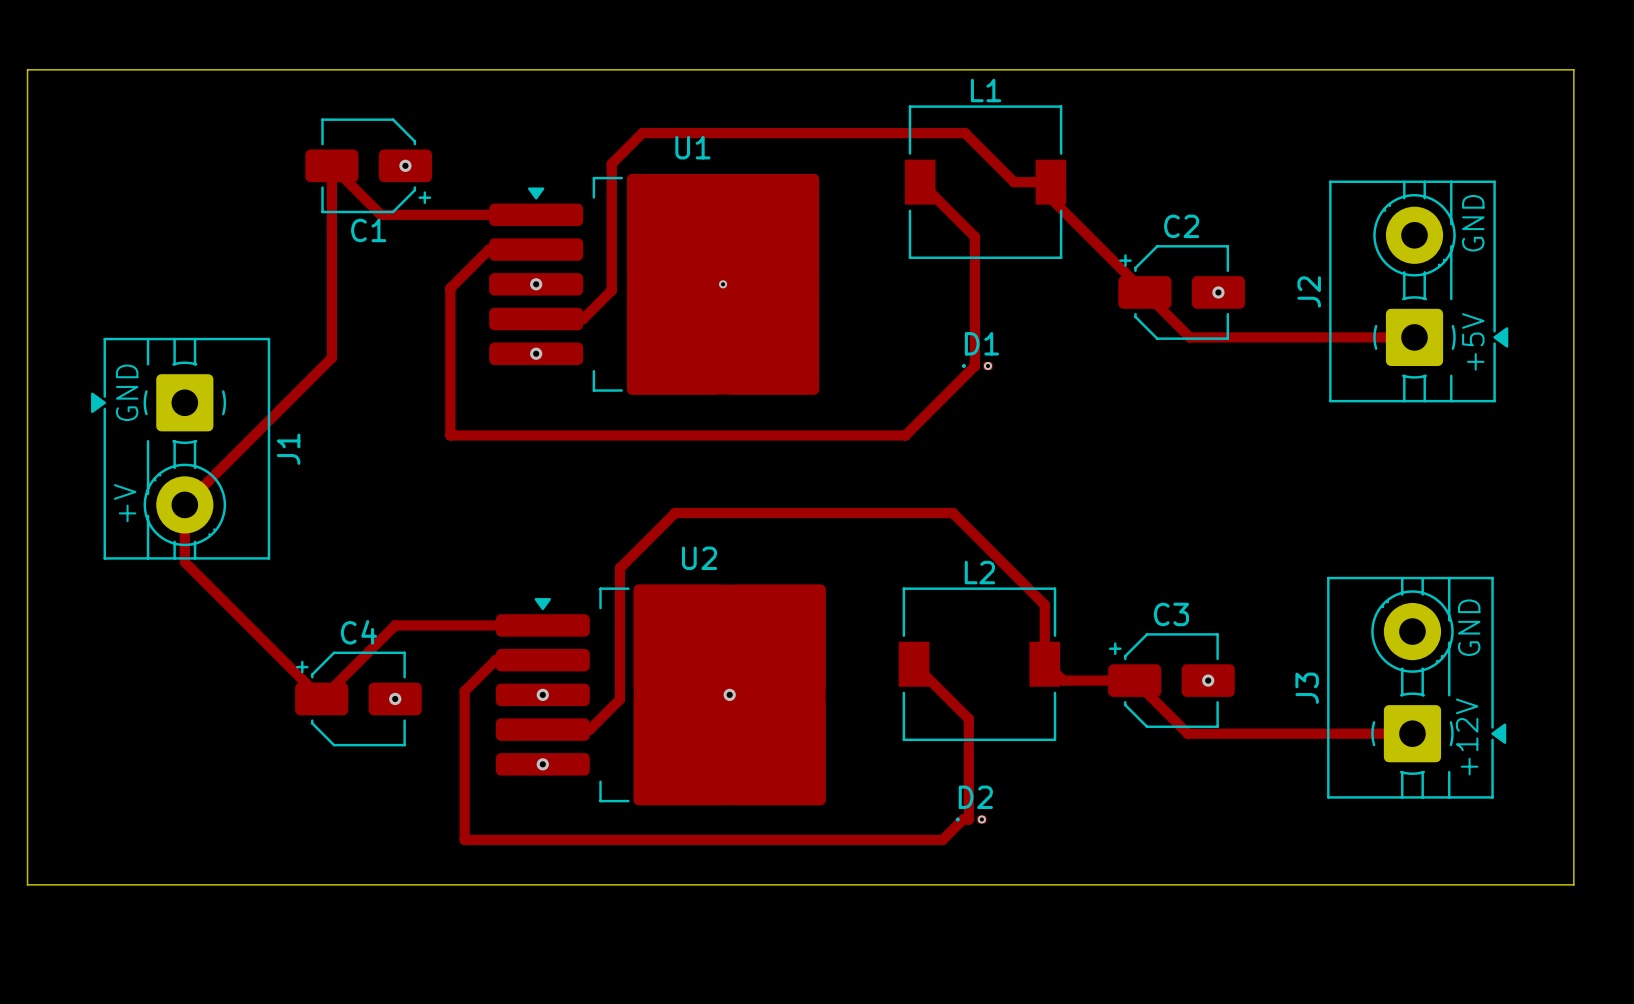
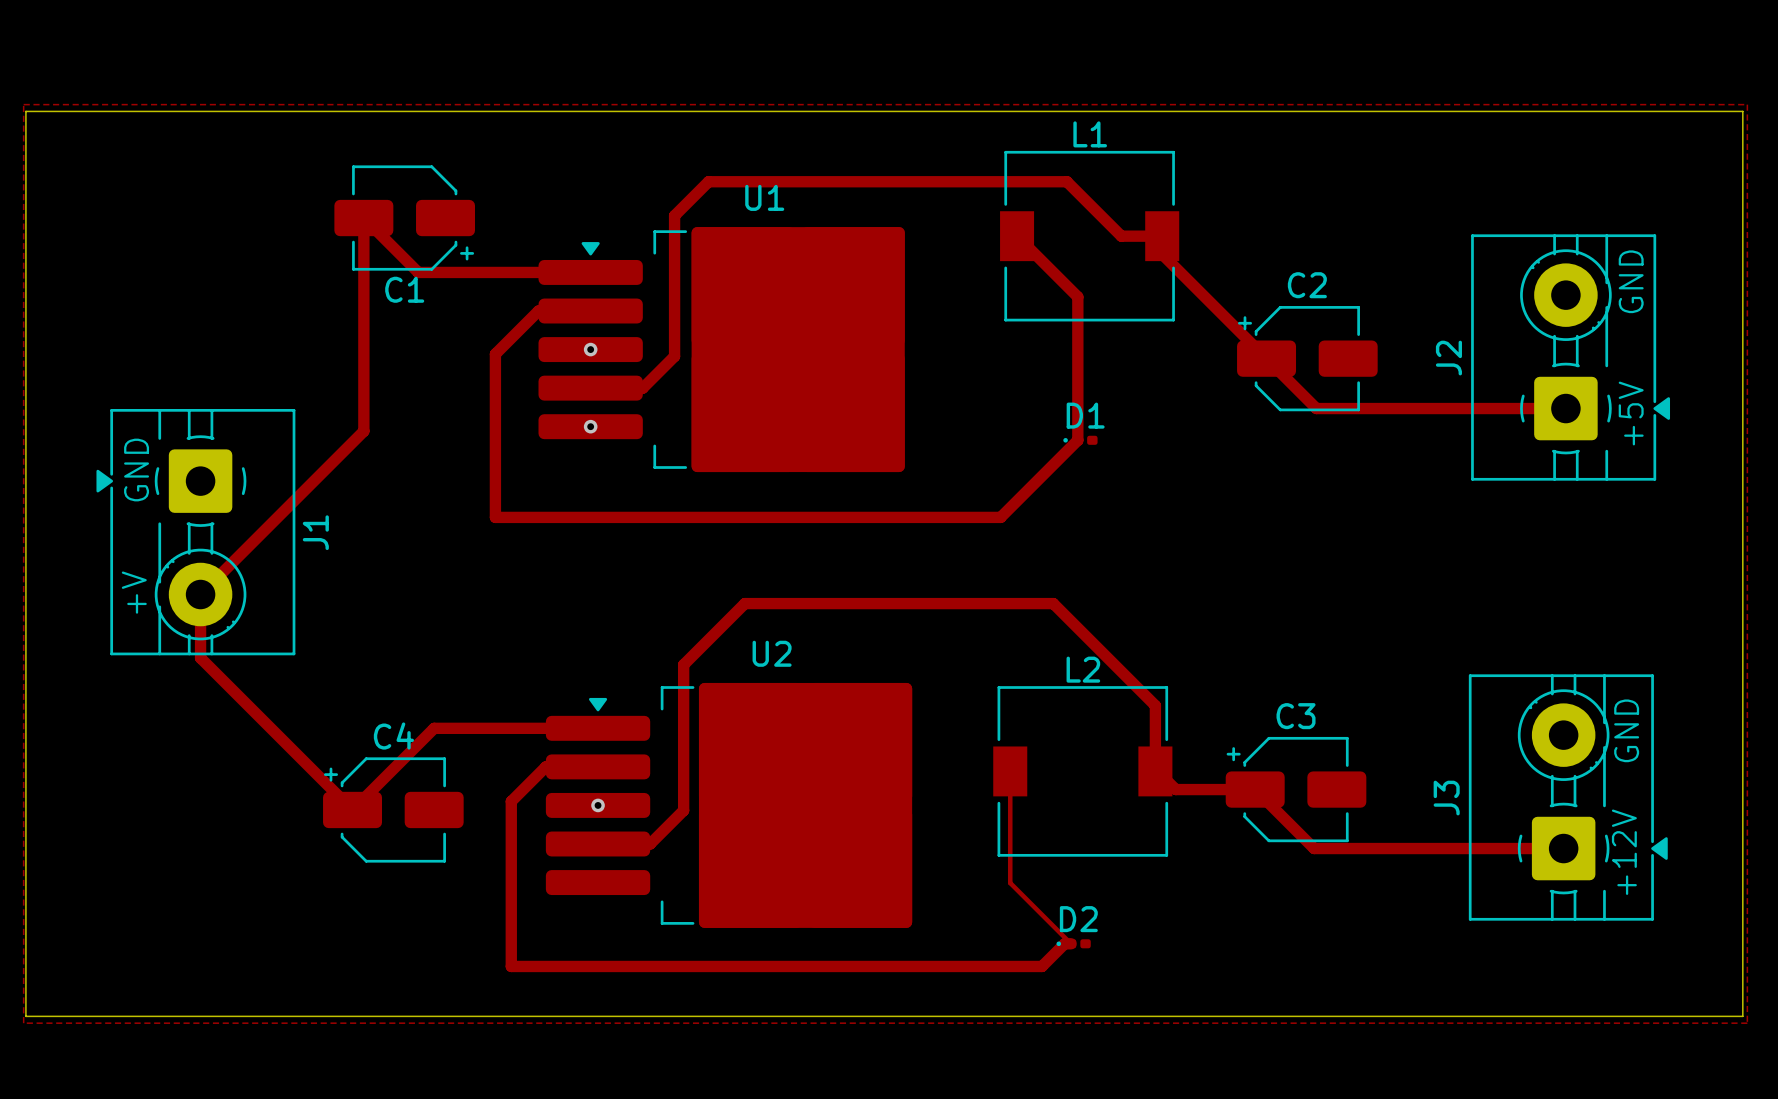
zone outline: none -> (23, 104) (1747, 104) (1747, 1023) (23, 1023) (23, 104)
via: (405, 165) -> none
via: (723, 284) -> none
via: (1218, 292) -> none
via: (988, 366) -> none
track: (914, 664) (968, 718) (968, 819) -> (1010, 771) (1010, 883) (1071, 943)
via: (1208, 680) -> none
via: (729, 694) -> none
via: (395, 698) -> none
via: (542, 764) -> none
via: (981, 819) -> none

